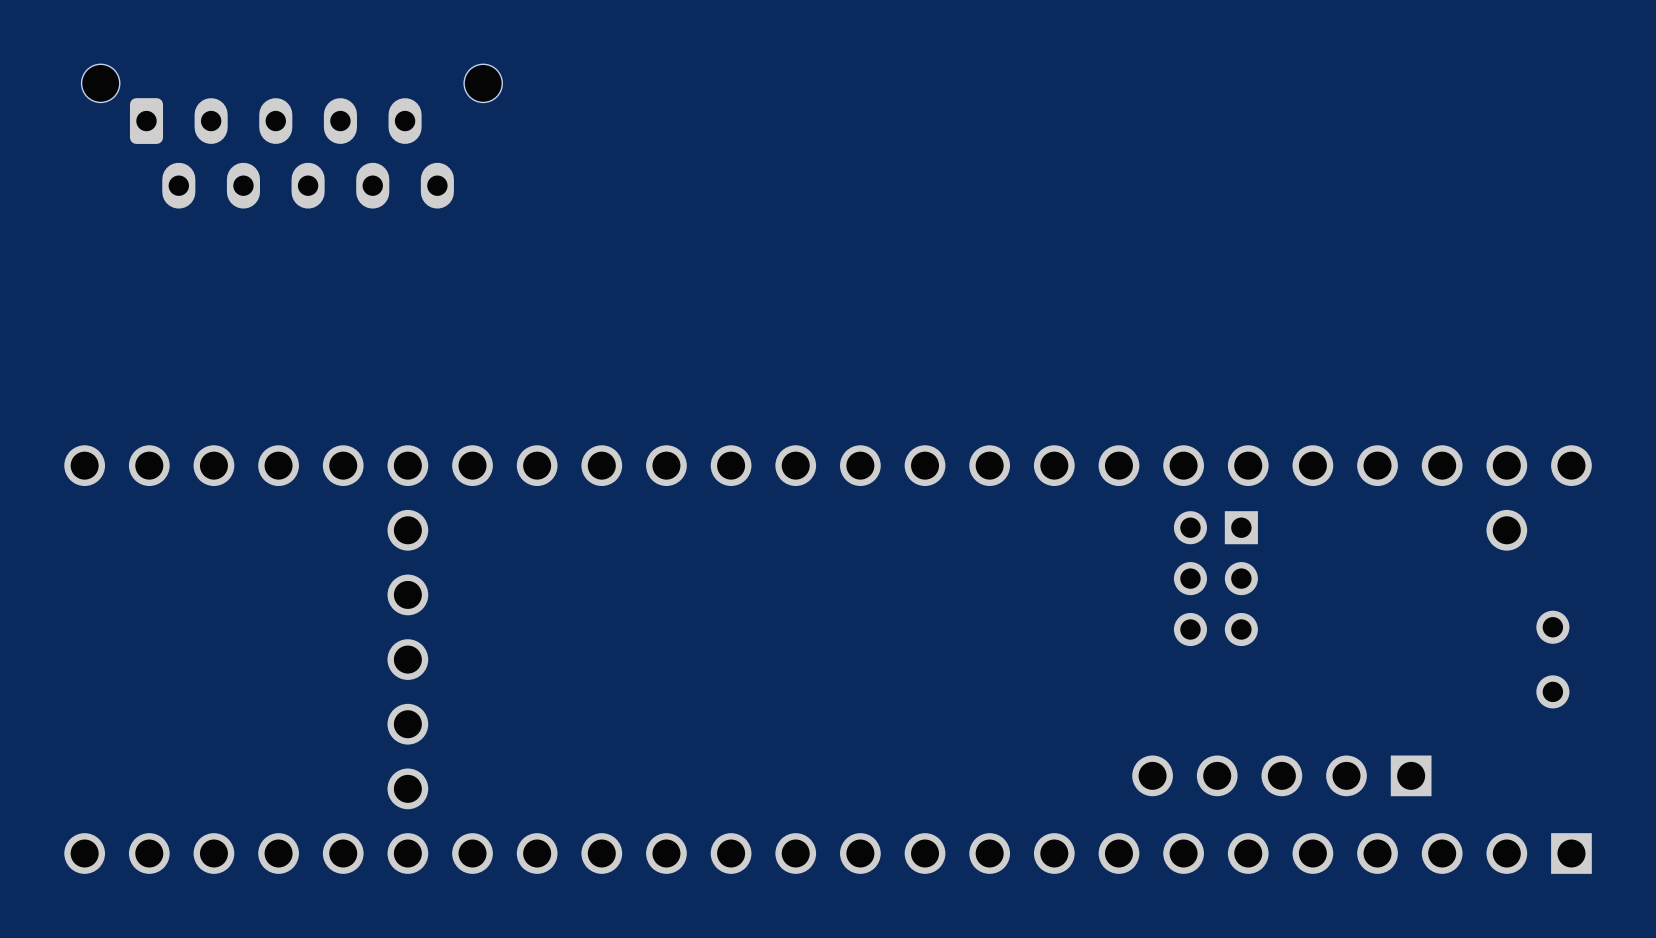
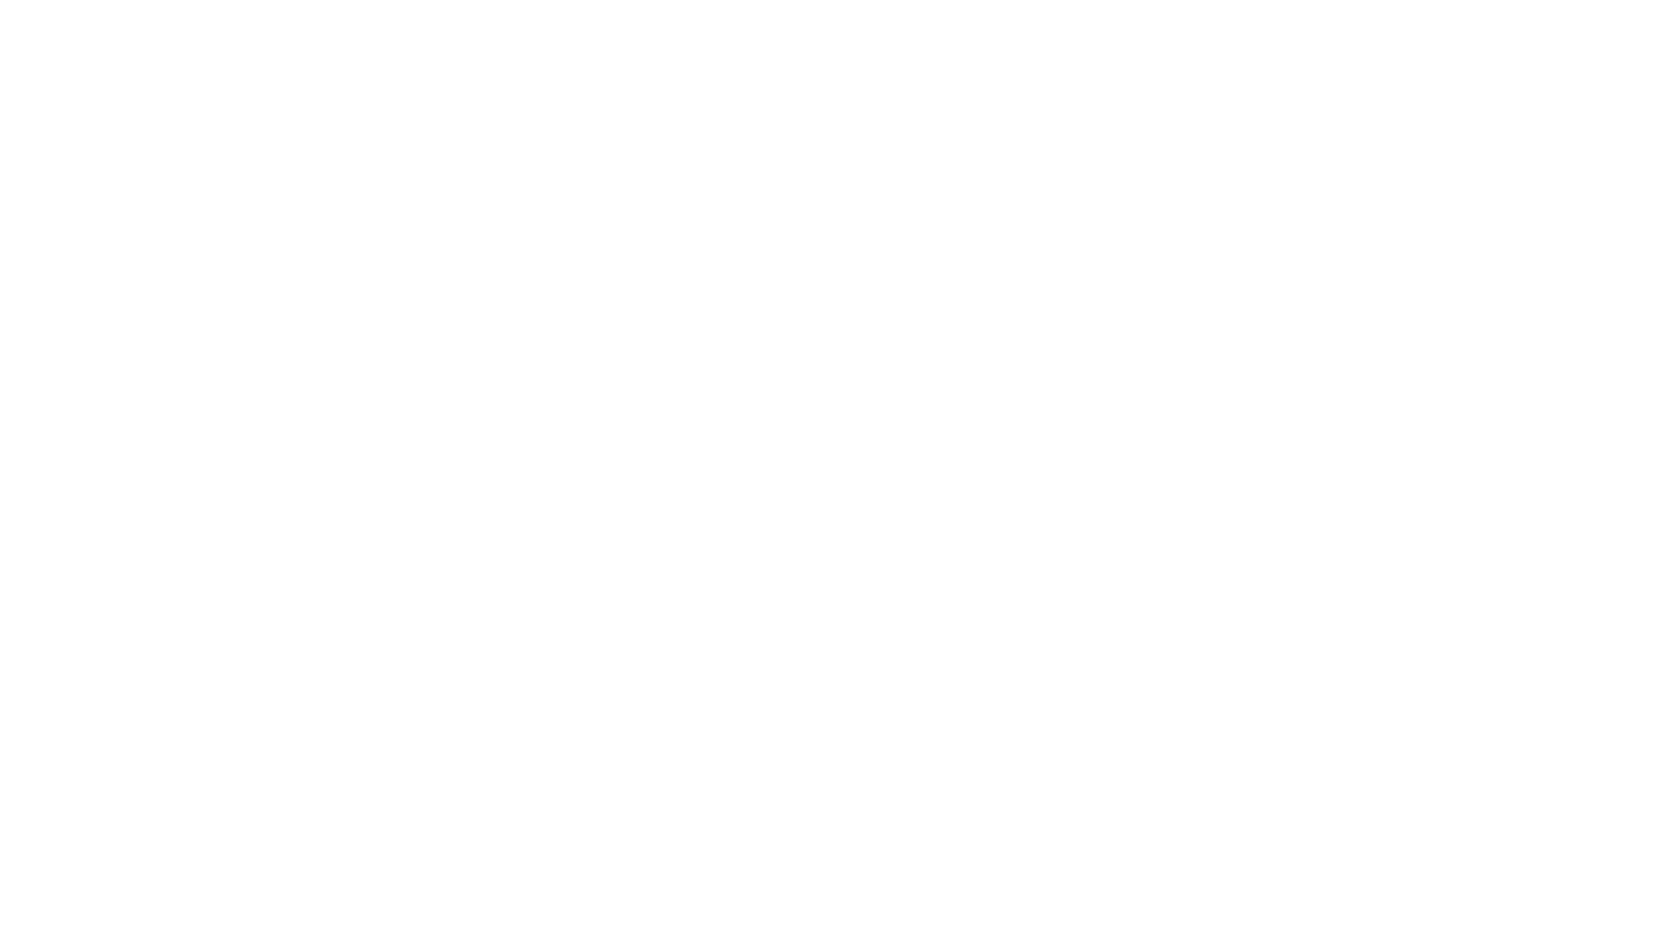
part: (291, 136) -> none
part: (828, 659) -> none

